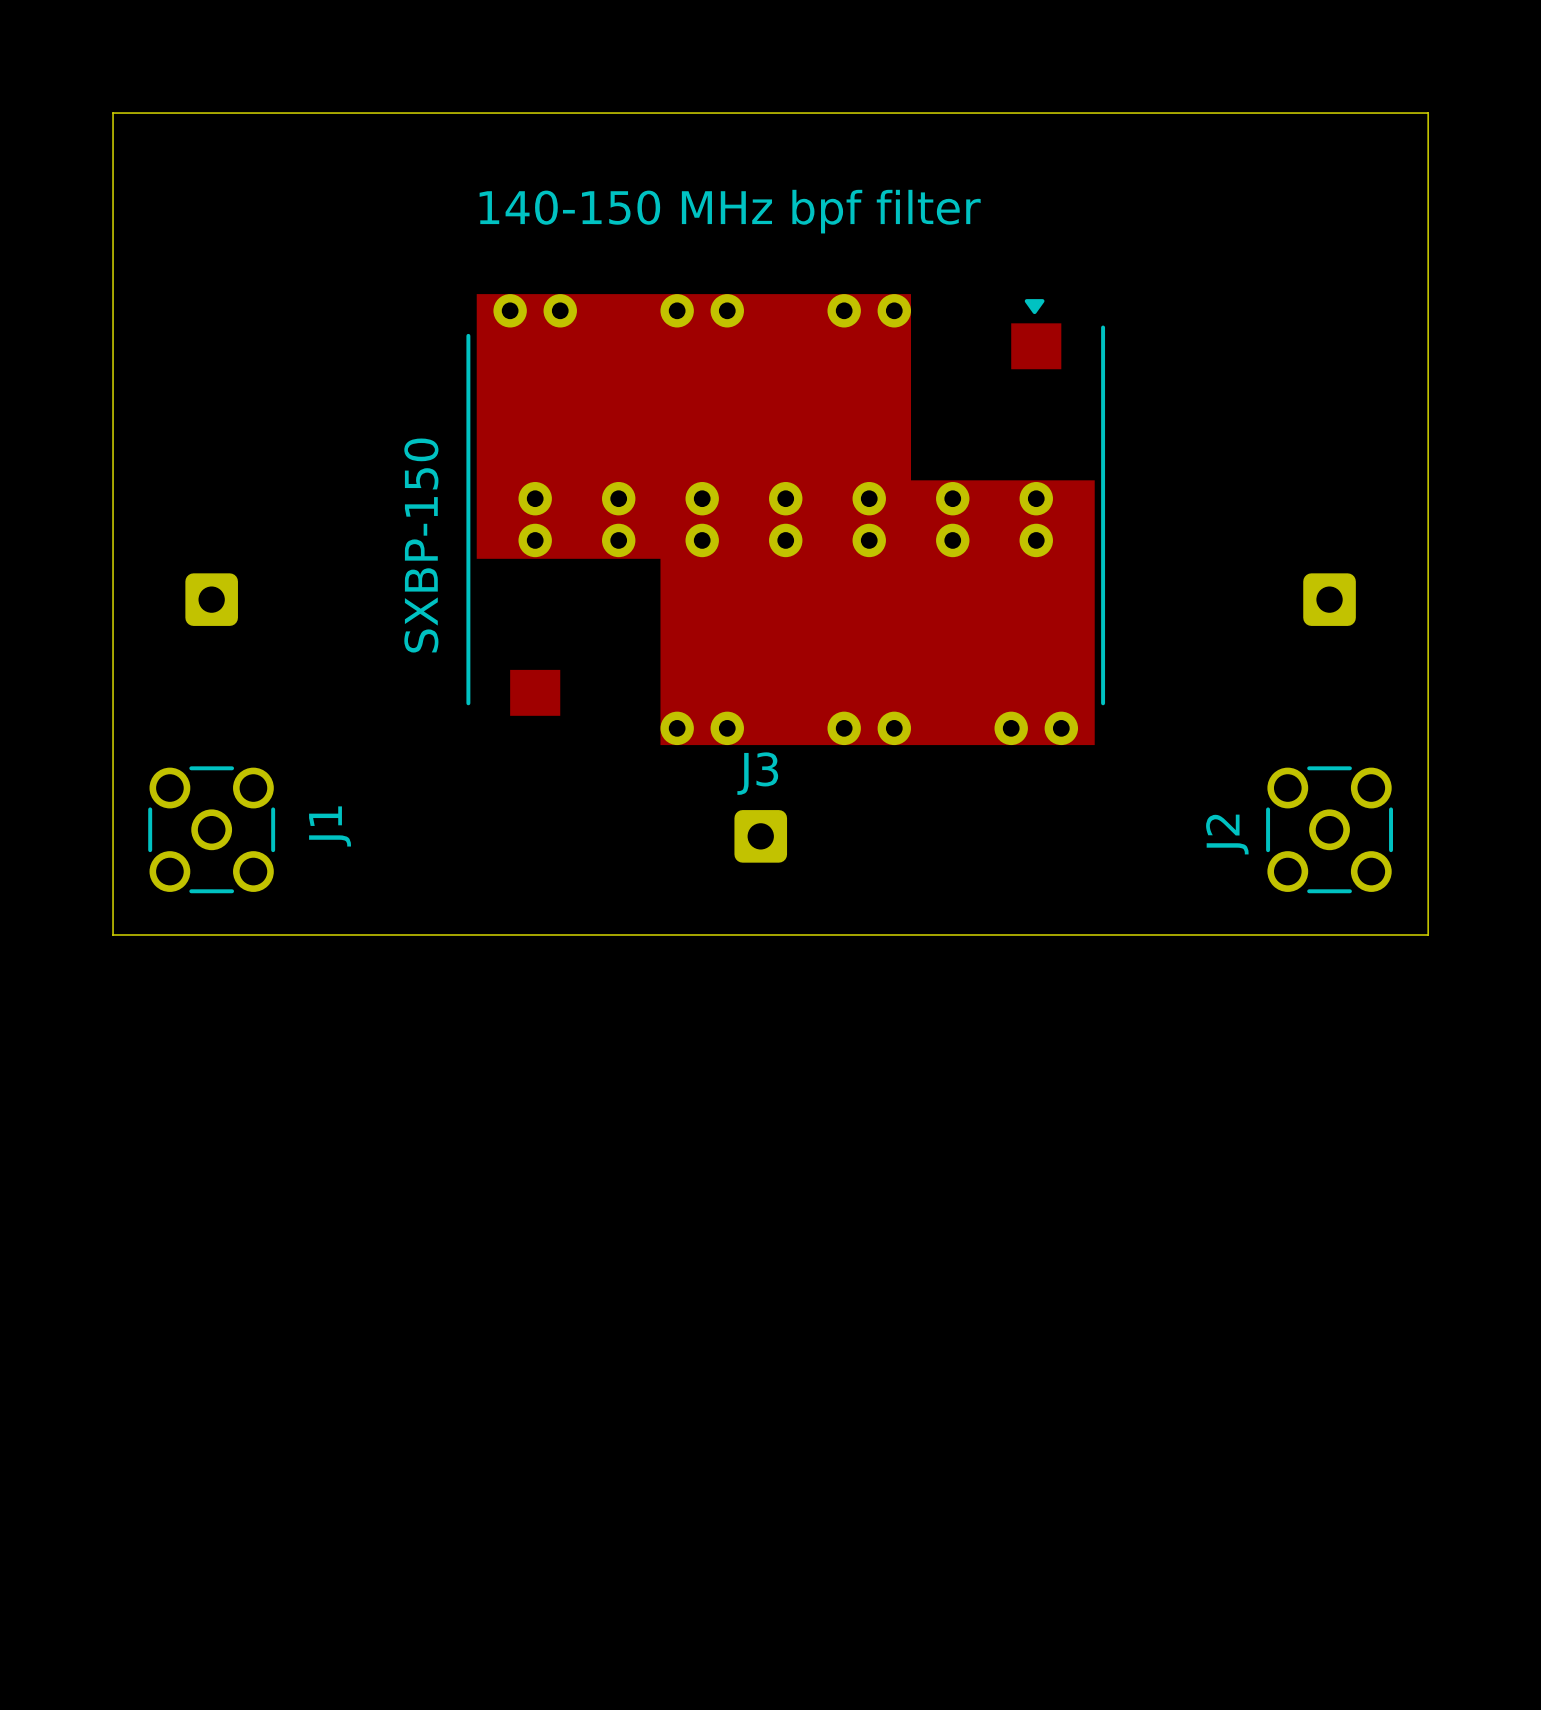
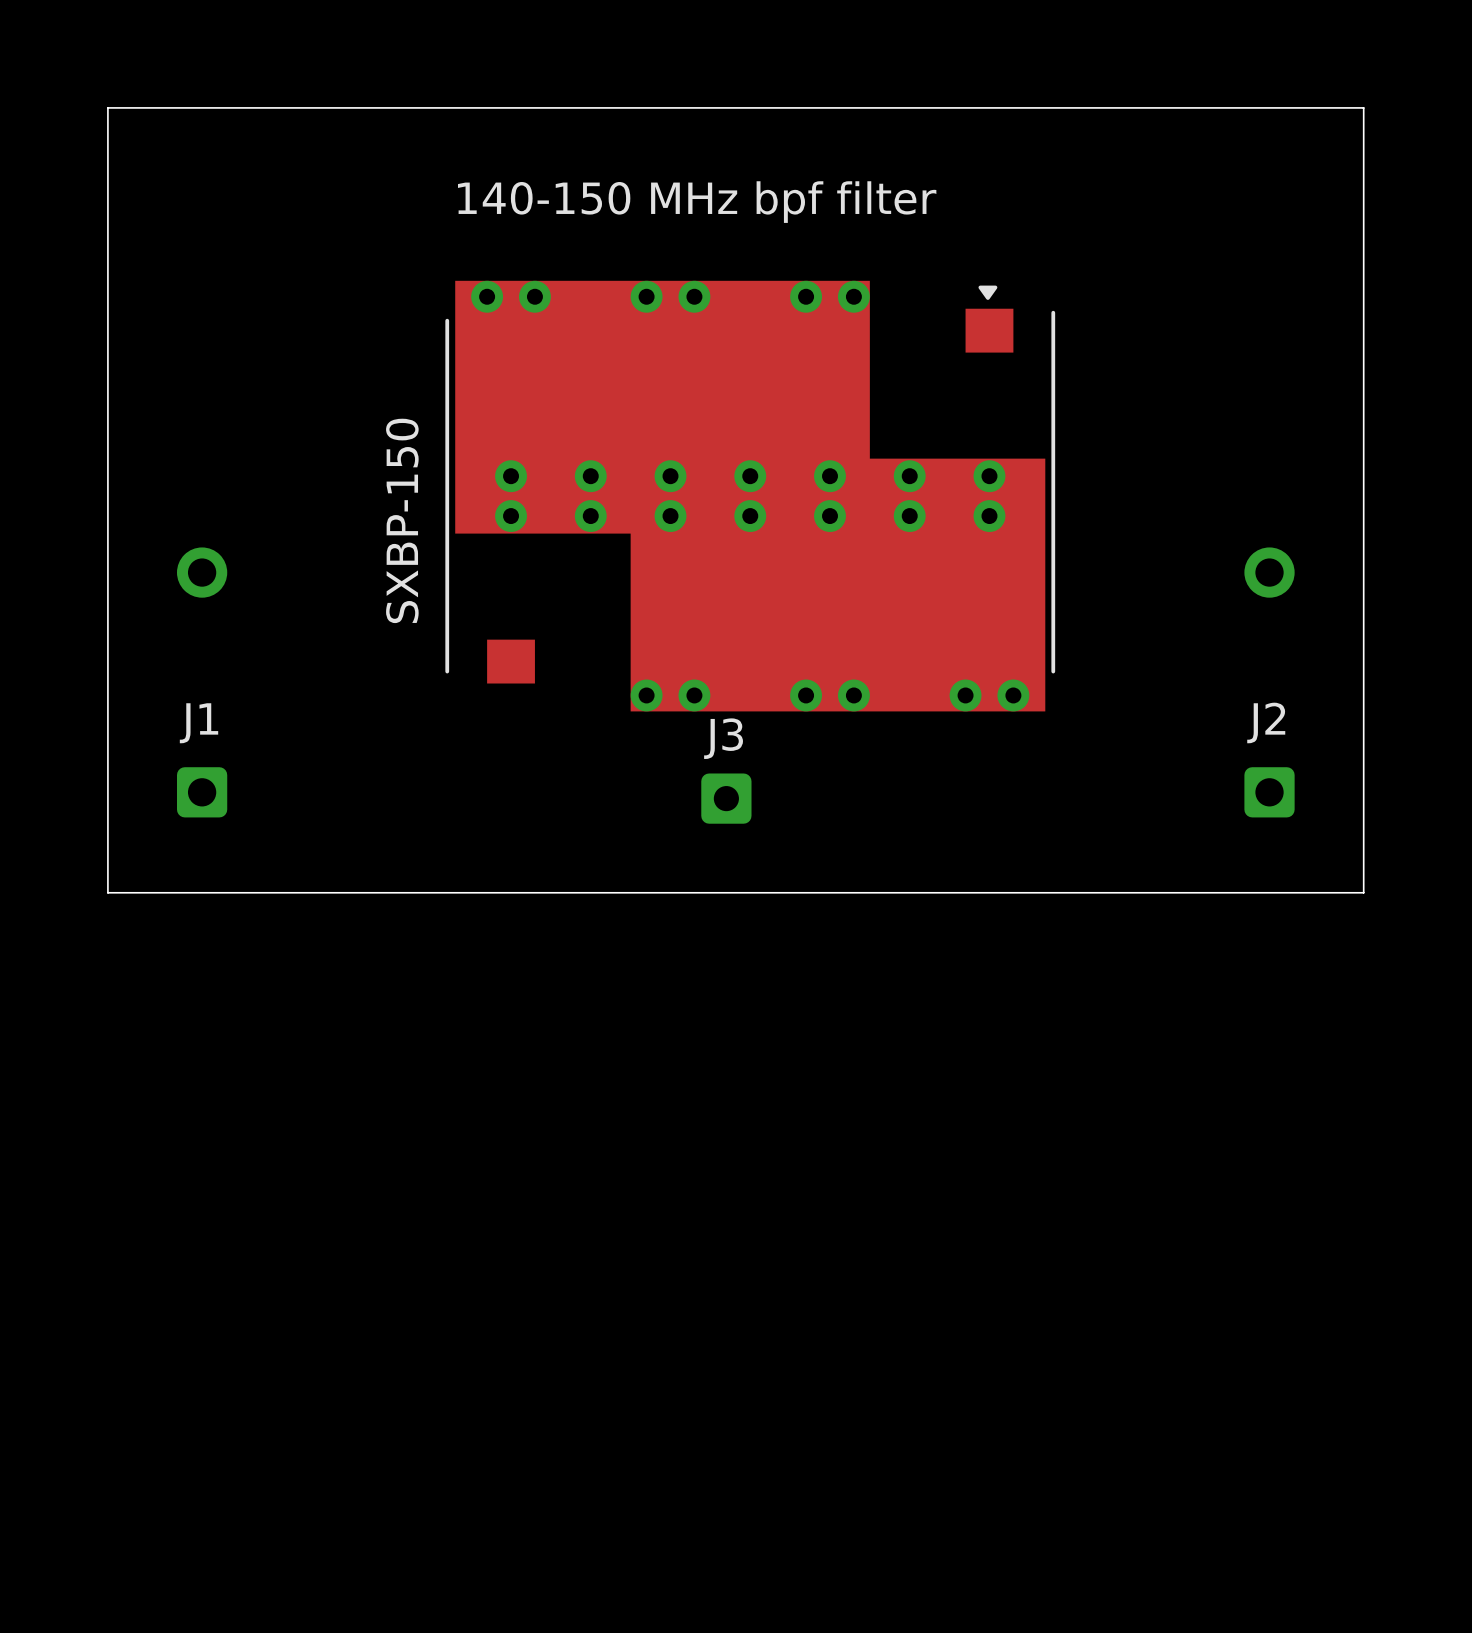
part: (211, 599) -> none
part: (1329, 599) -> none
J1 footprint: [148, 766, 276, 894] -> [176, 547, 228, 818]
J2 footprint: [1266, 766, 1394, 894] -> [1244, 547, 1295, 818]
J1 name position: J1 (330, 826) -> J1 (199, 723)
J2 name position: J2 (1227, 834) -> J2 (1266, 722)

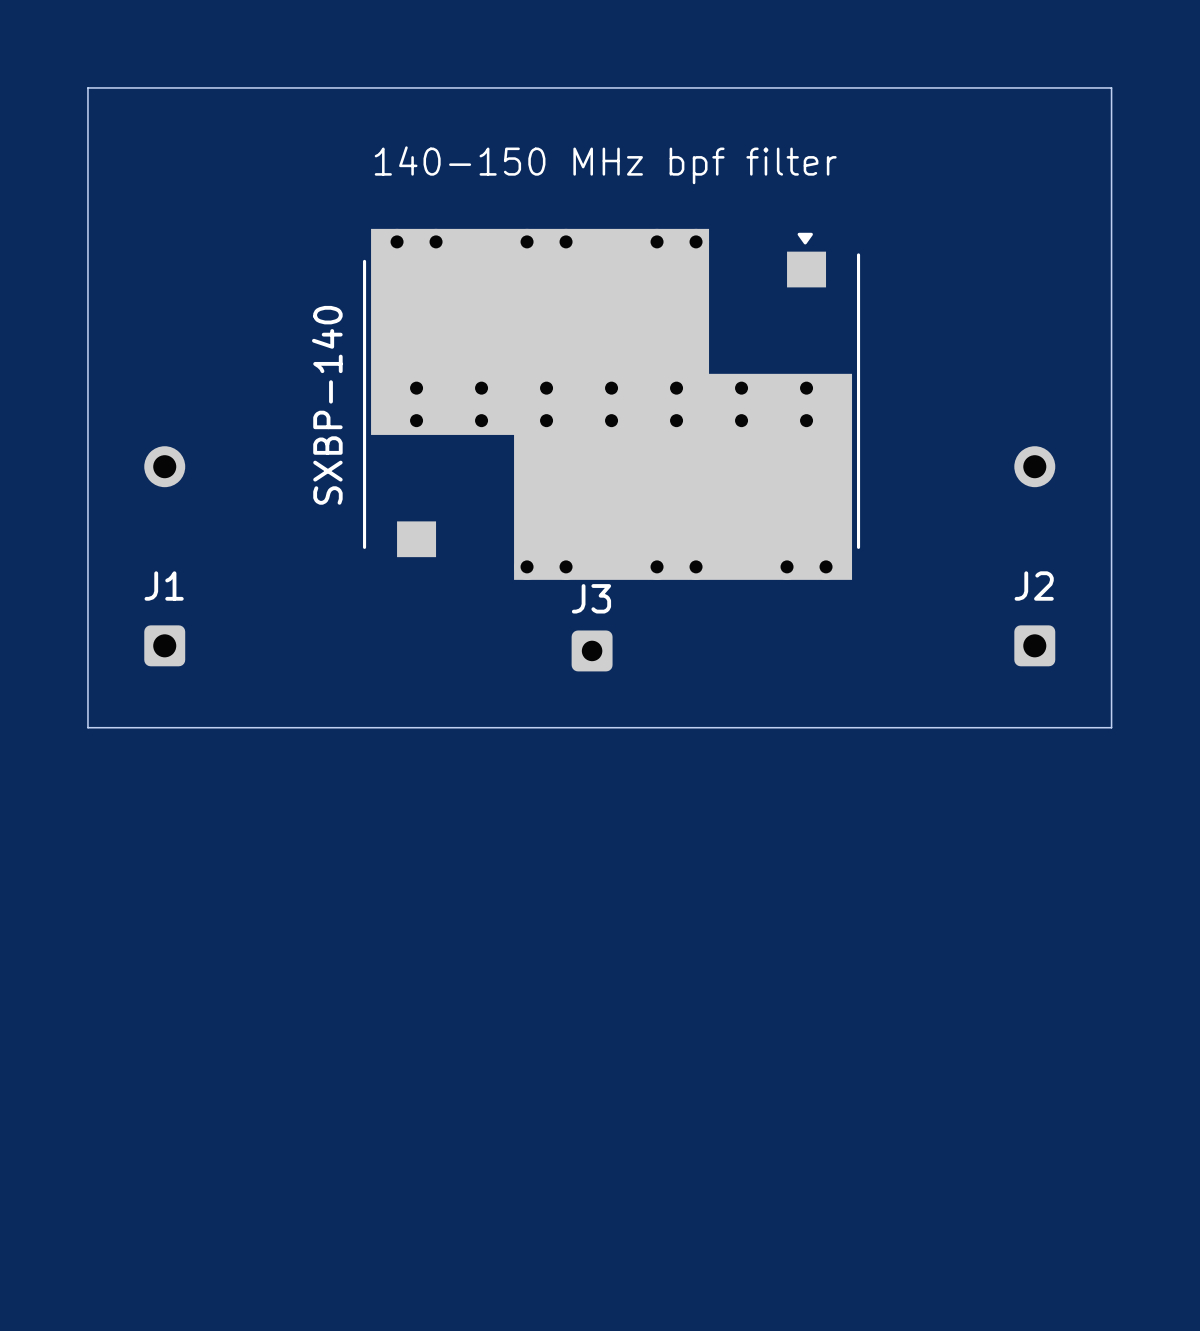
text: SXBP-150 (402, 520) -> SXBP-140 (327, 405)

